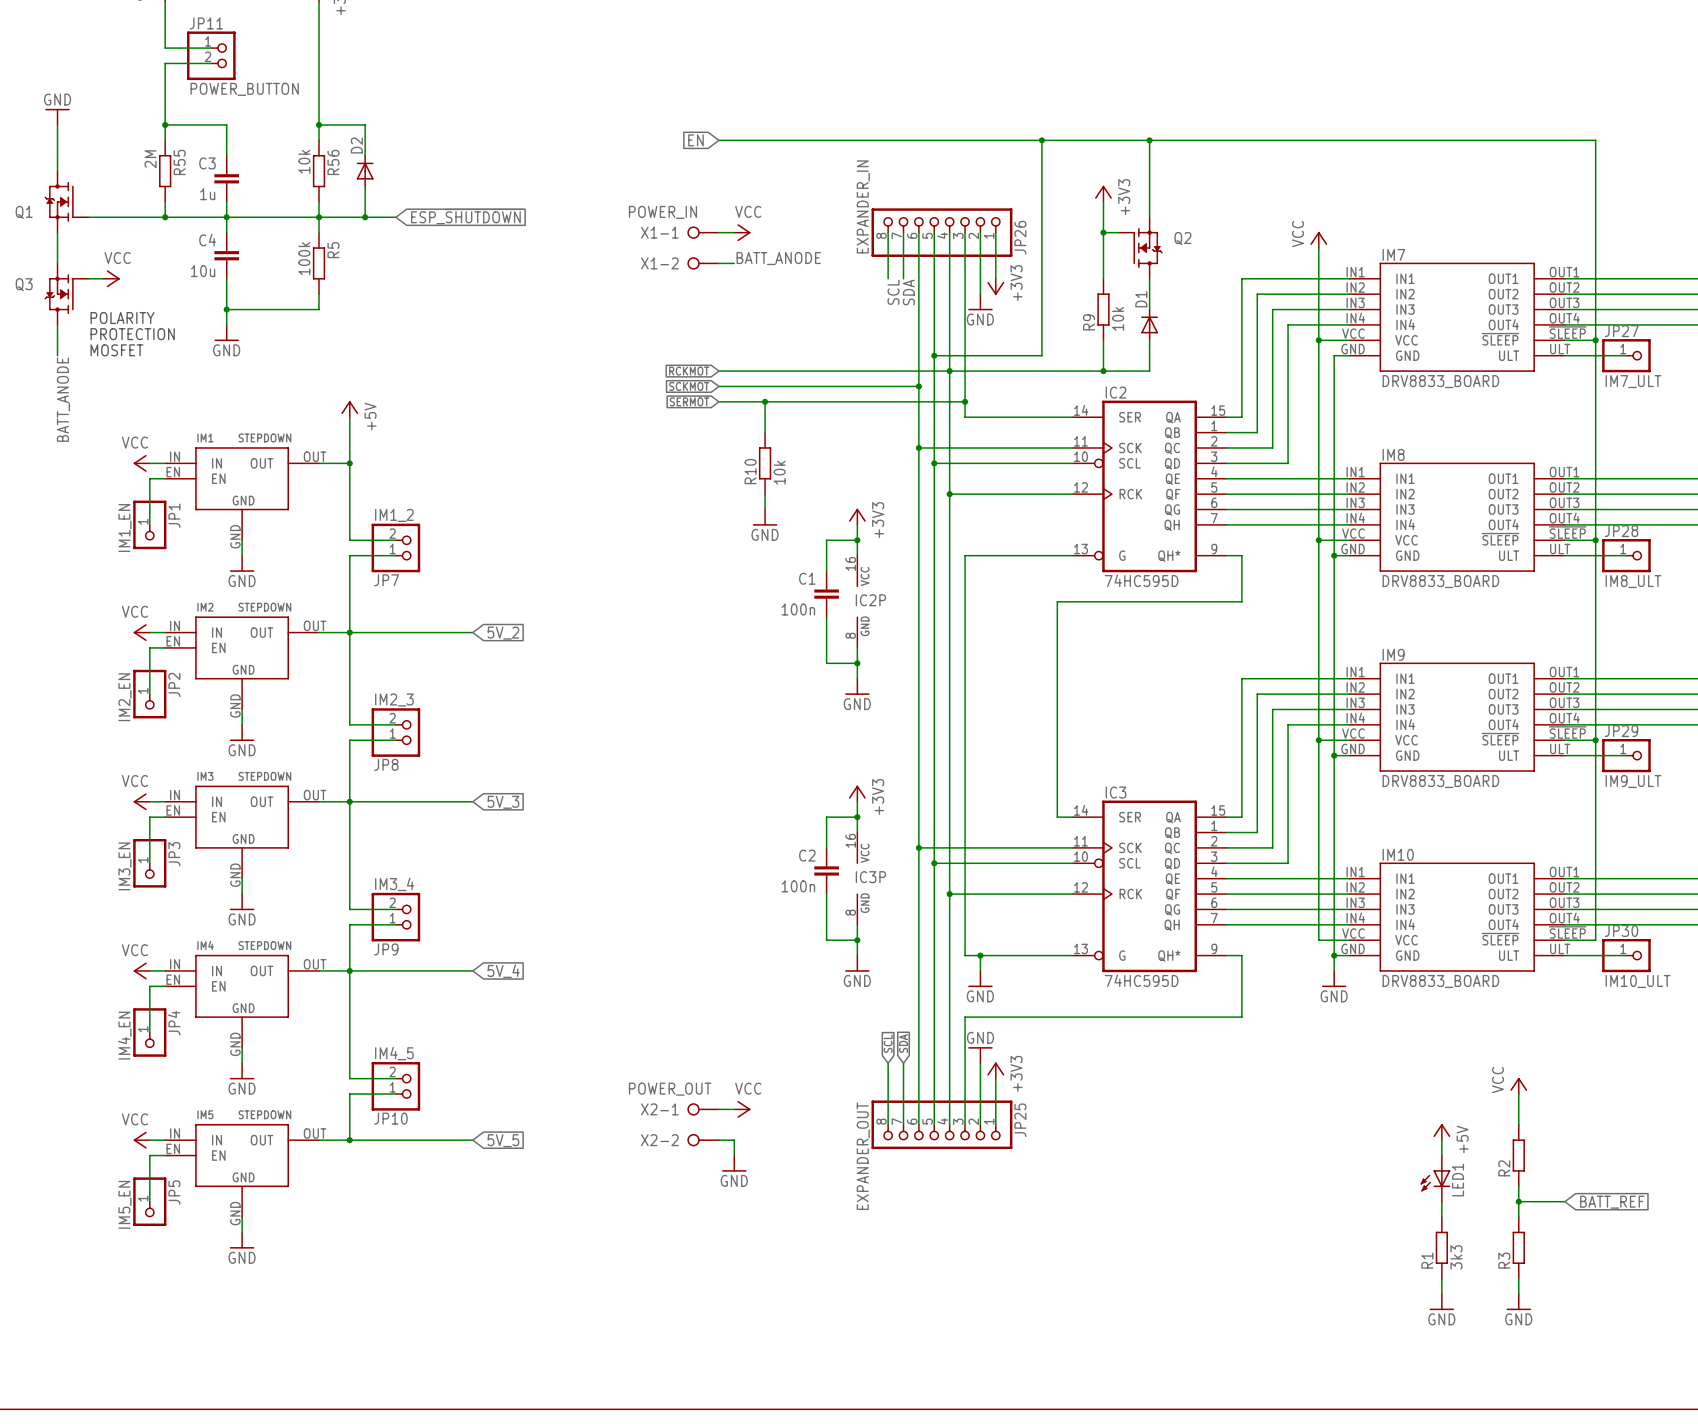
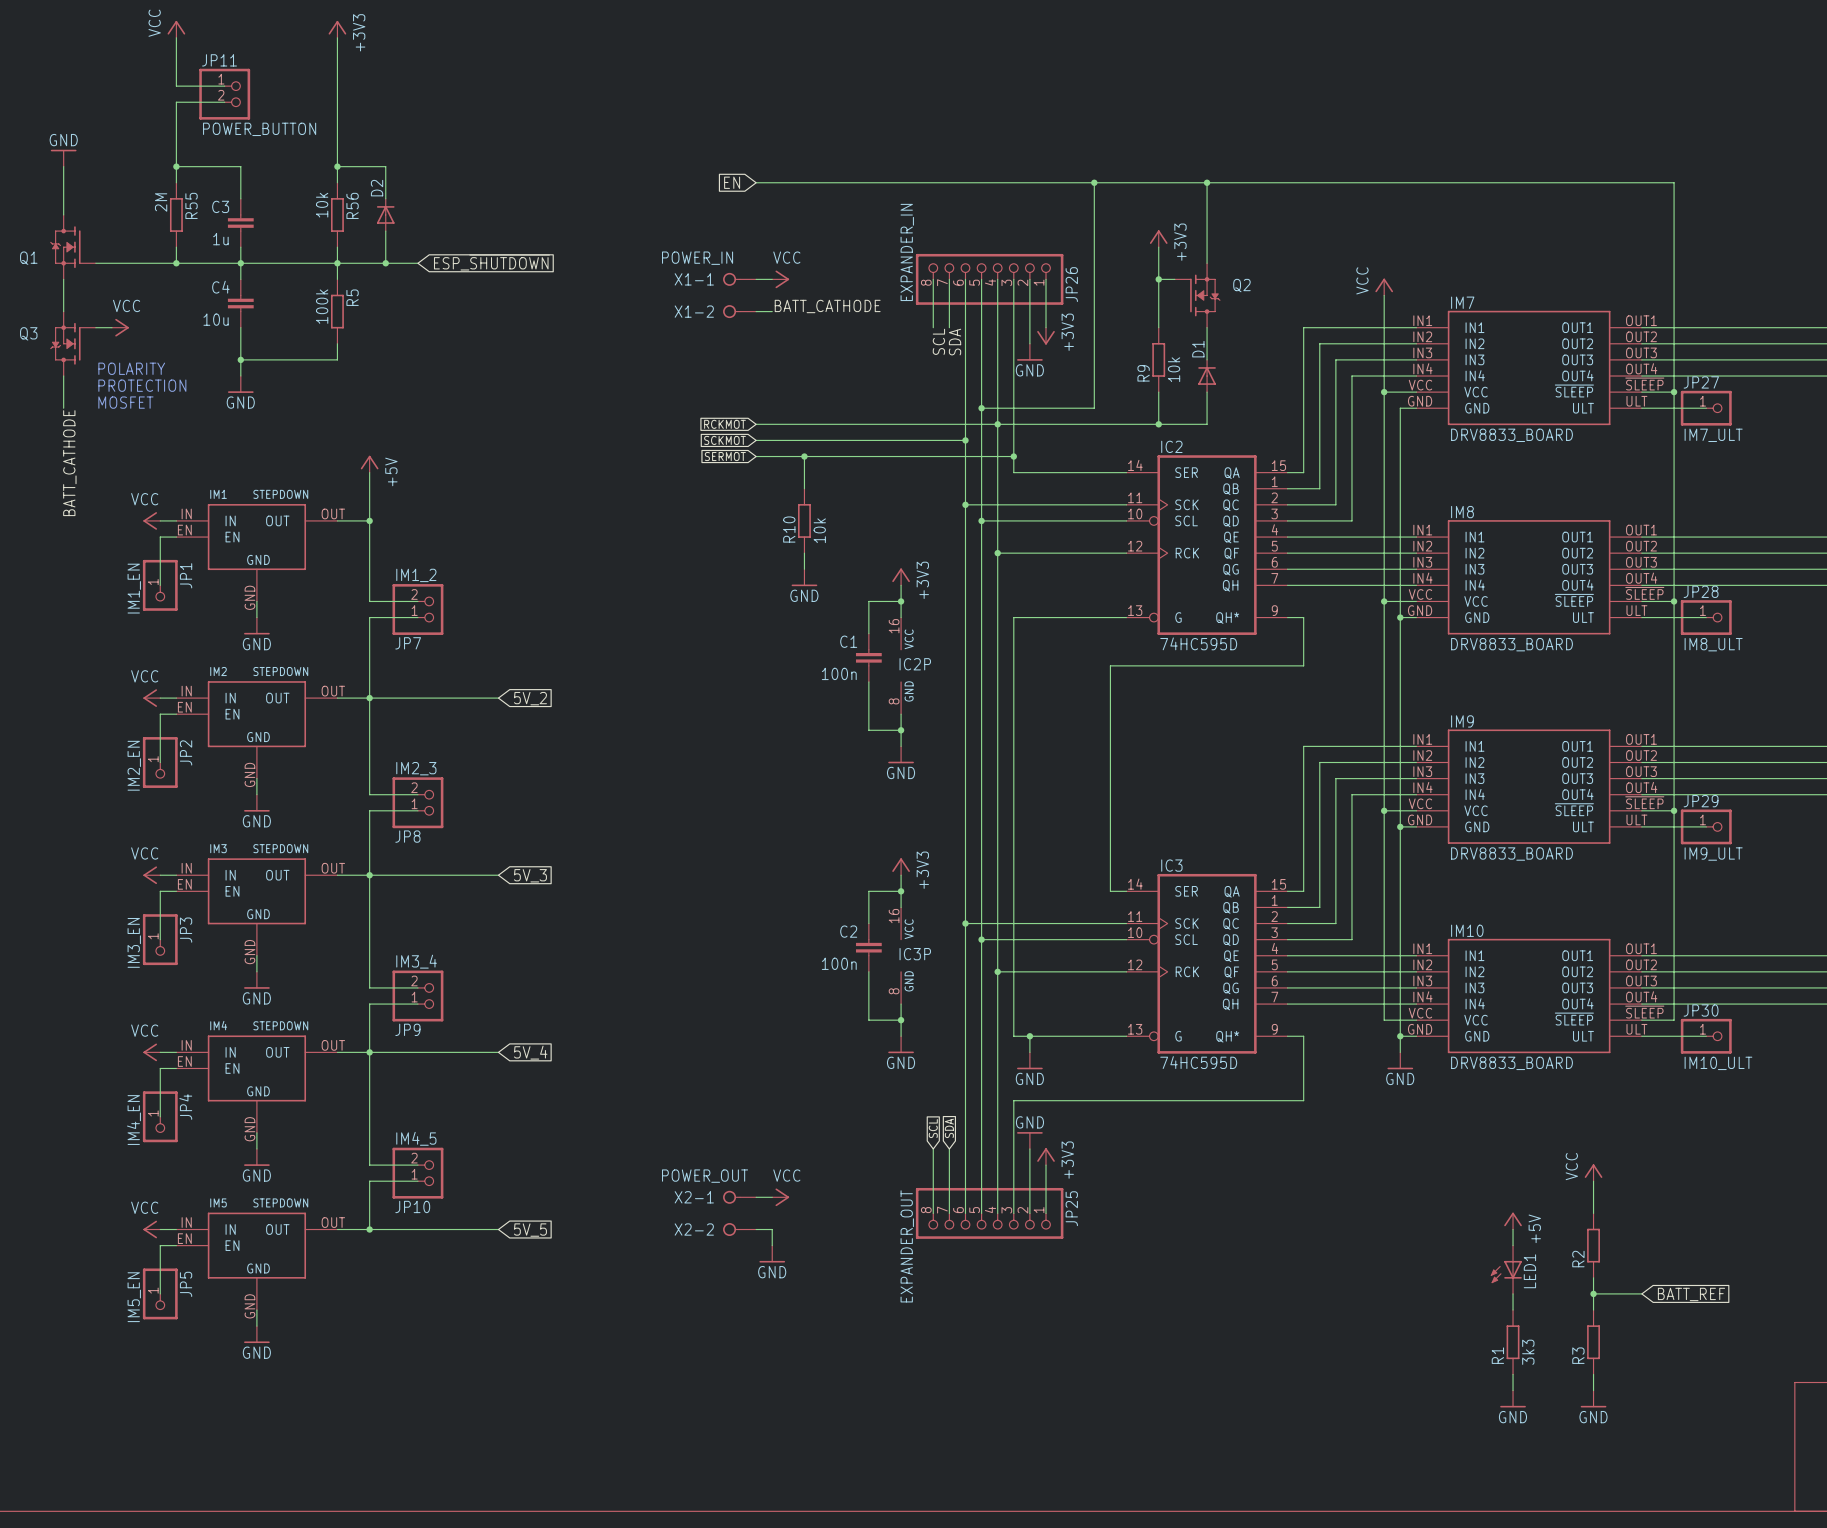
label: BATT_ANODE (778, 258) -> BATT_CATHODE (827, 306)
label: BATT_ANODE (63, 399) -> BATT_CATHODE (69, 463)

